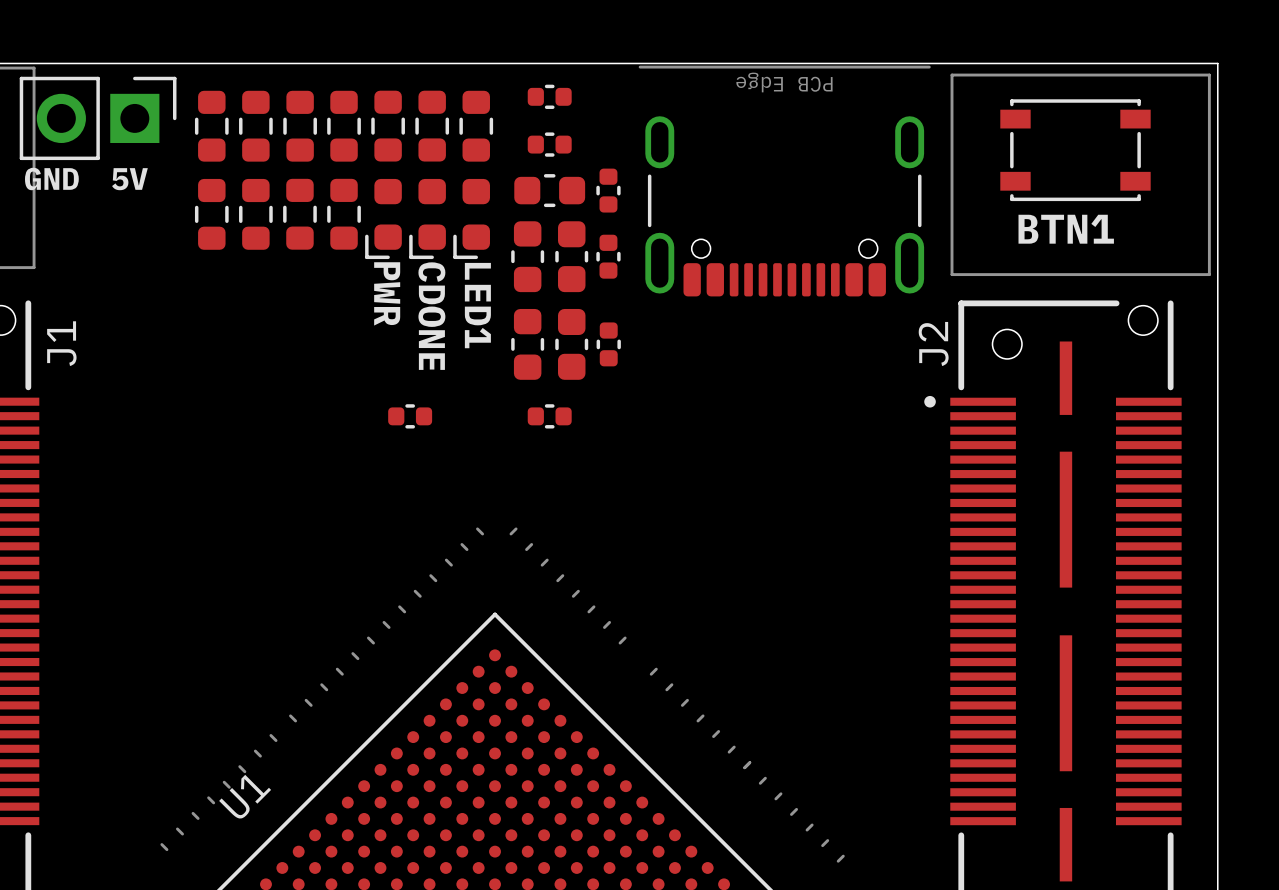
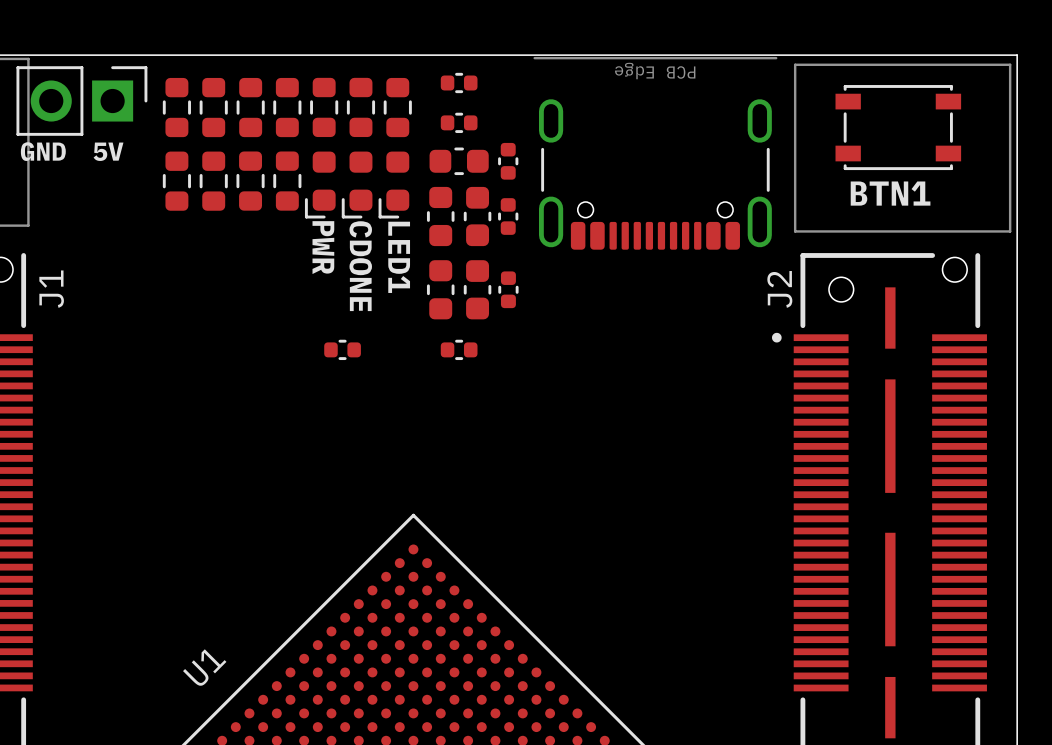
line: (477, 528) (482, 534) -> none
line: (516, 528) (510, 534) -> none
line: (461, 544) (467, 549) -> none
line: (531, 544) (526, 549) -> none
line: (446, 560) (451, 565) -> none
line: (547, 560) (542, 565) -> none
line: (430, 575) (435, 580) -> none
line: (562, 575) (557, 580) -> none
line: (415, 591) (420, 596) -> none
line: (578, 591) (573, 596) -> none
line: (399, 606) (404, 611) -> none
line: (594, 606) (588, 611) -> none
line: (384, 622) (389, 627) -> none
line: (609, 622) (604, 627) -> none
line: (368, 637) (373, 643) -> none
line: (625, 637) (620, 643) -> none
line: (352, 653) (357, 658) -> none
line: (337, 669) (342, 674) -> none
line: (656, 669) (651, 674) -> none
line: (321, 684) (326, 689) -> none
line: (671, 684) (666, 689) -> none
line: (306, 700) (311, 705) -> none
line: (687, 700) (682, 705) -> none
line: (290, 715) (295, 720) -> none
line: (703, 715) (697, 720) -> none
line: (718, 731) (713, 736) -> none
line: (270, 735) (276, 740) -> none
line: (734, 747) (729, 752) -> none
line: (255, 751) (260, 756) -> none
line: (749, 762) (744, 767) -> none
line: (239, 766) (244, 771) -> none
line: (765, 778) (760, 783) -> none
line: (224, 782) (229, 787) -> none
line: (780, 793) (775, 798) -> none
line: (208, 797) (213, 802) -> none
line: (796, 809) (791, 814) -> none
line: (193, 813) (198, 818) -> none
line: (812, 824) (807, 830) -> none
line: (177, 828) (182, 834) -> none
line: (827, 840) (822, 845) -> none
line: (161, 844) (166, 849) -> none
line: (843, 856) (838, 861) -> none

